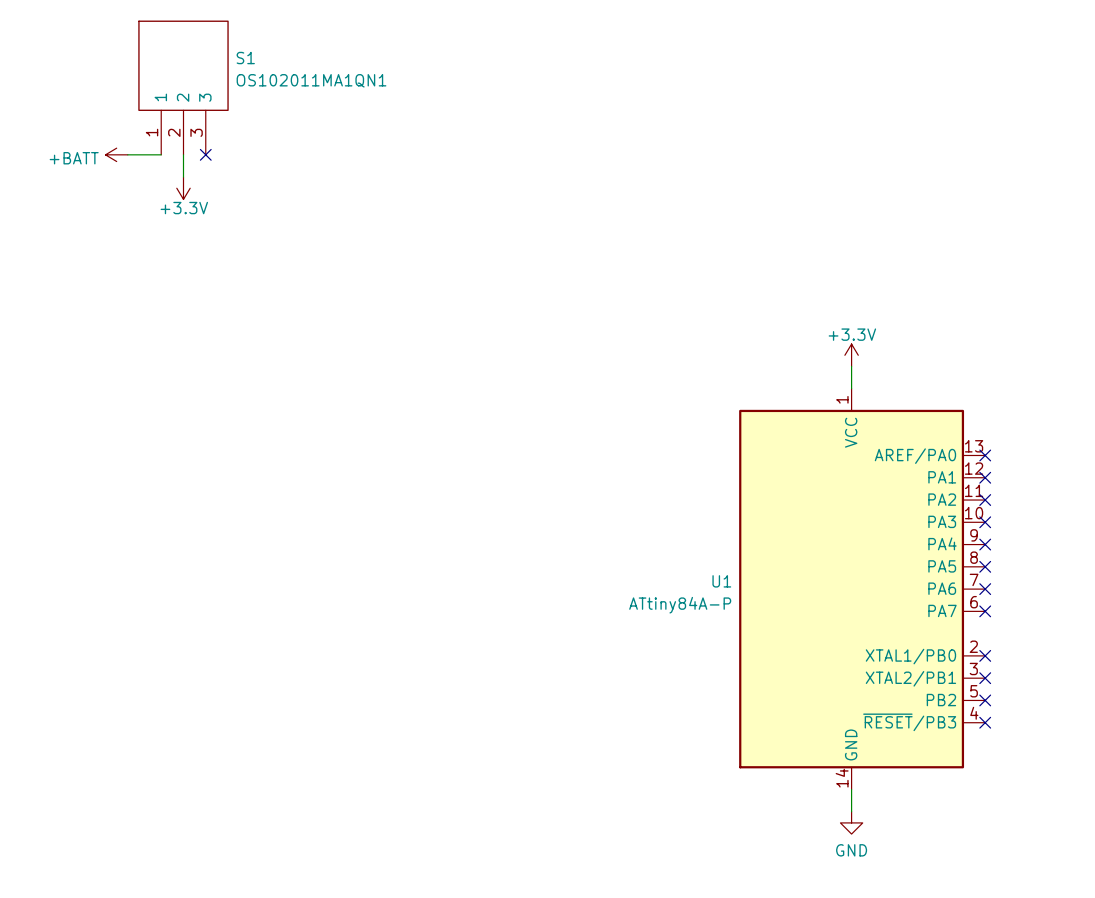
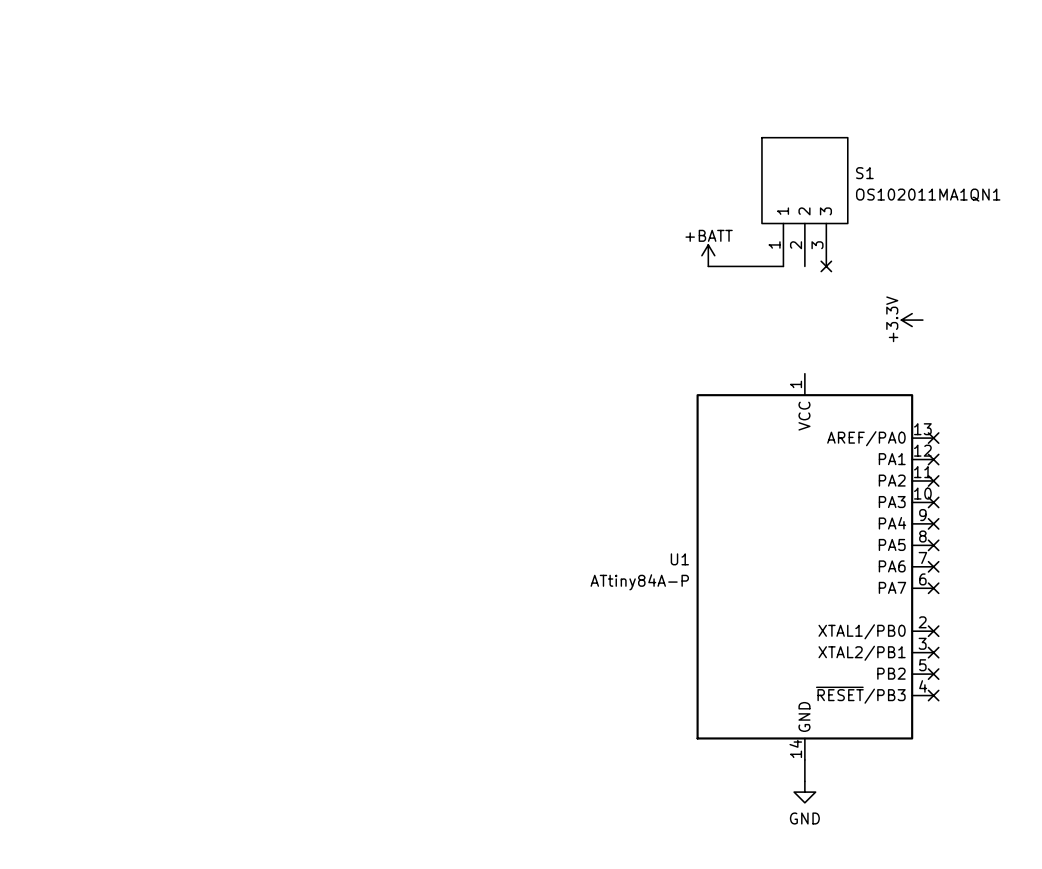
S1 position: (183, 87) -> (804, 201)
power symbol: +BATT (116, 154) -> none
wire: (127, 154) (161, 154) -> none
wire: (183, 154) (183, 177) -> none
no-connect mark: (205, 154) -> none
power symbol: +3.3V (183, 188) -> none
power symbol: none -> +BATT (708, 255)
wire: none -> (708, 266) (783, 266)
no-connect mark: none -> (826, 266)
power symbol rotation: 0° (851, 355) -> 90° counterclockwise (912, 320)
power symbol position: +3.3V (851, 355) -> +3.3V (912, 320)
wire: (851, 366) (851, 388) -> none

